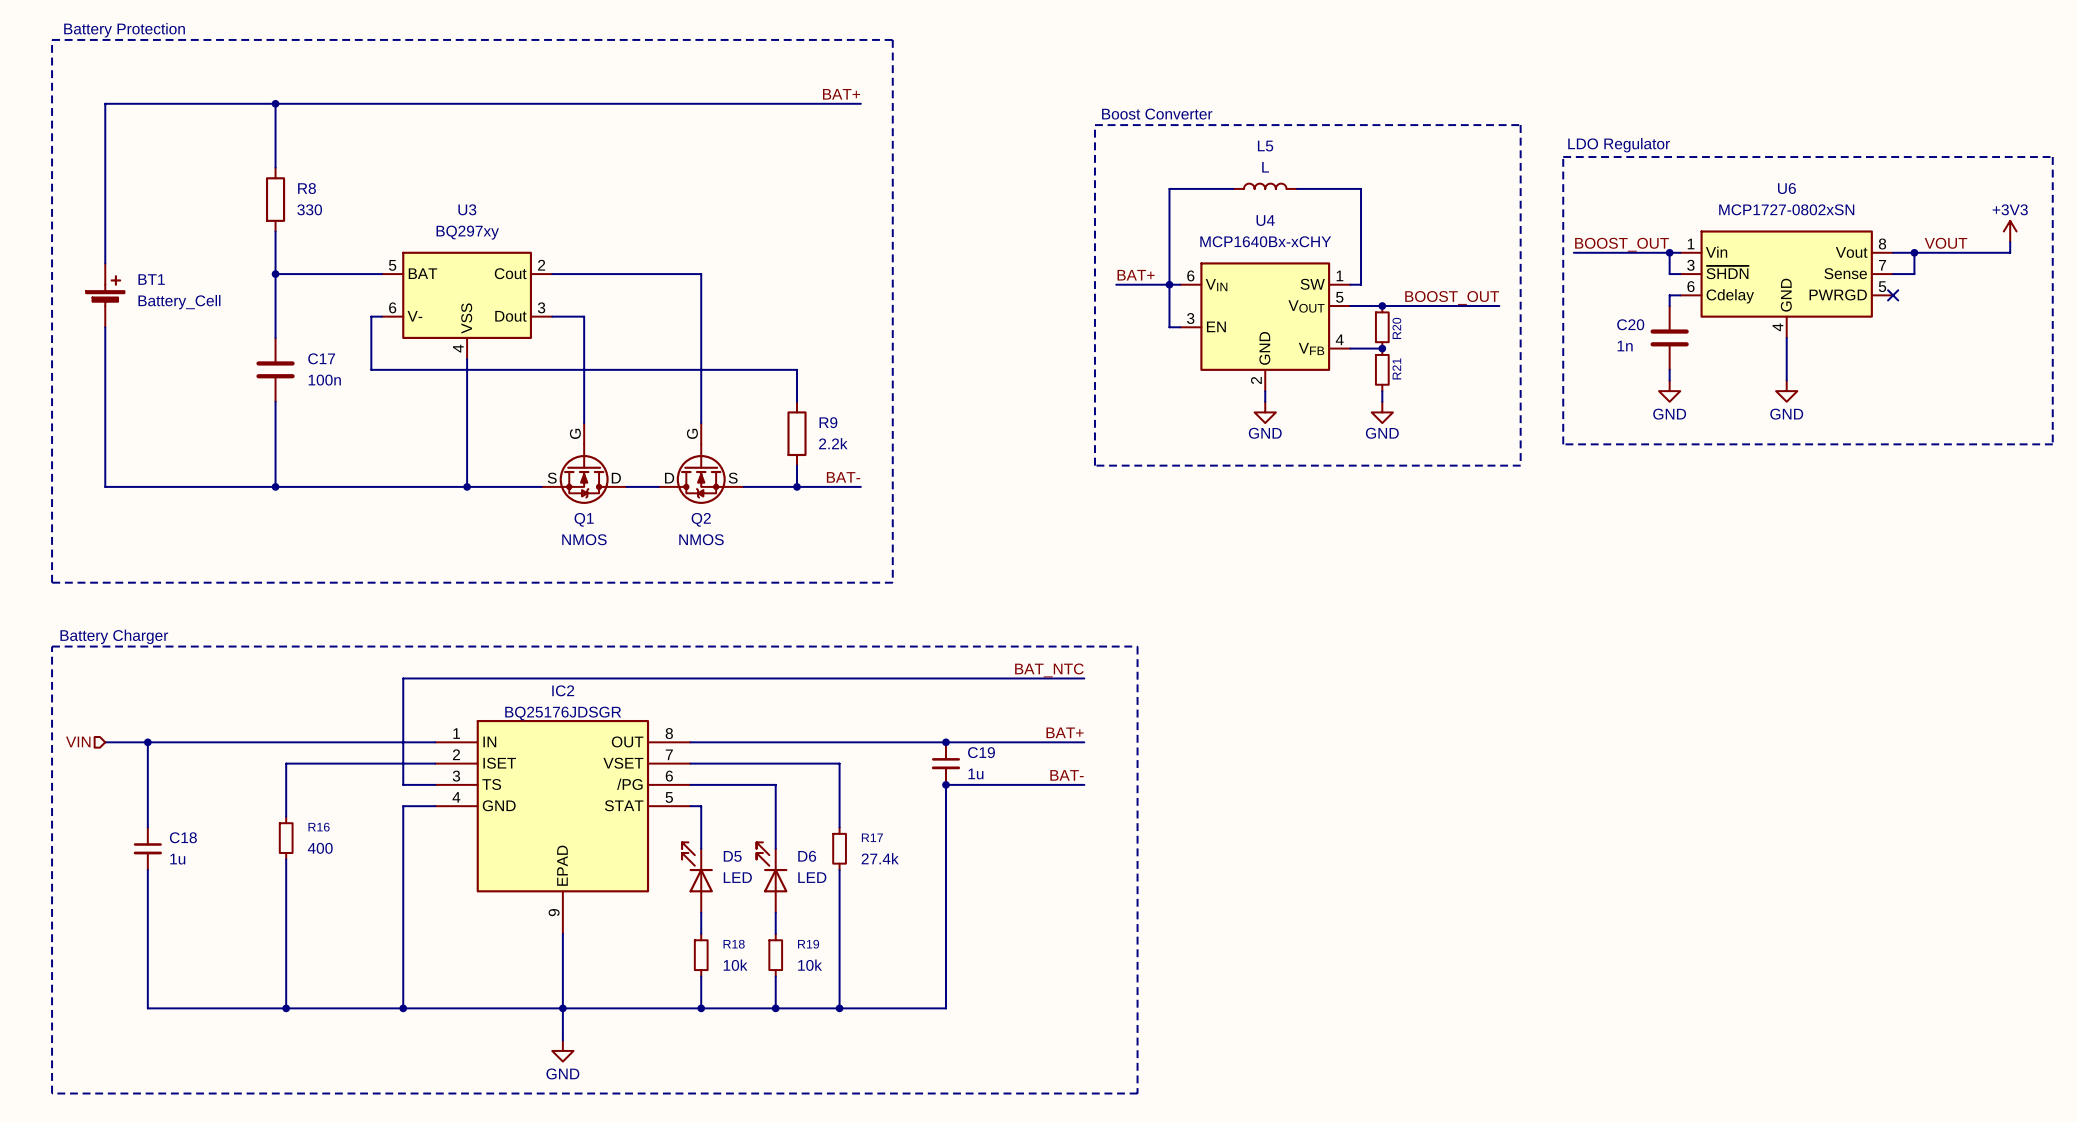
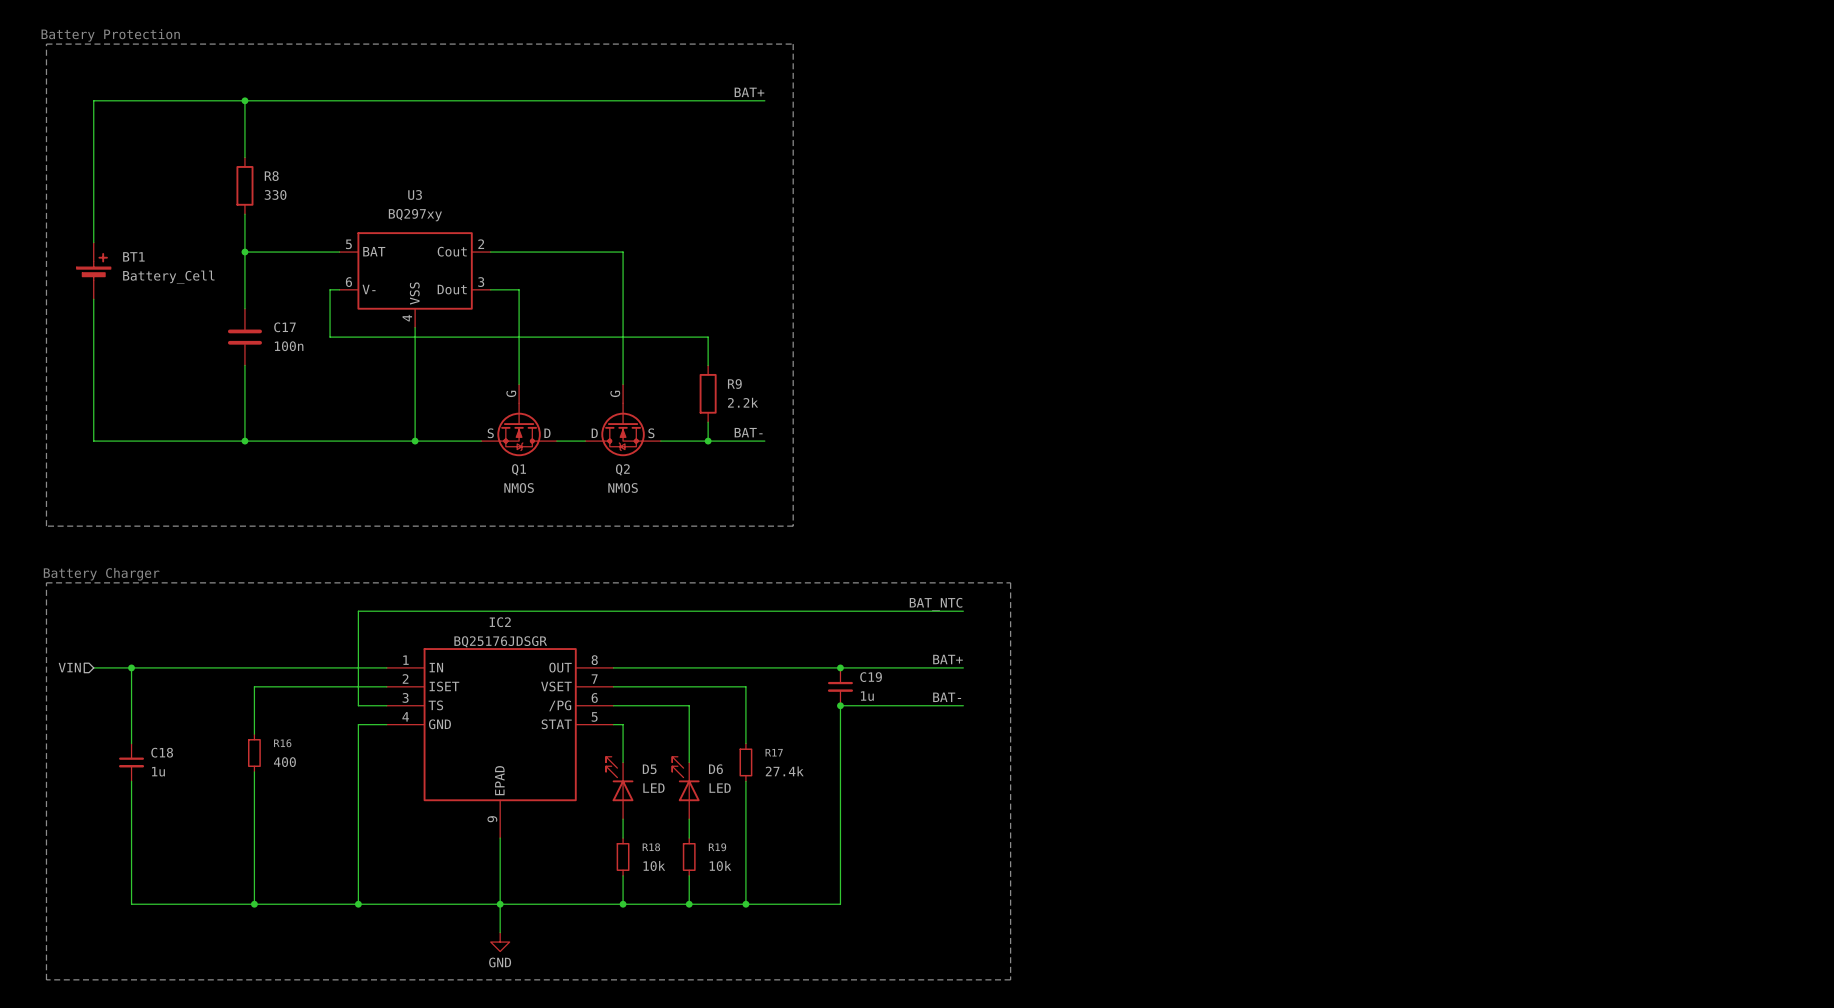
text: Boost Converter (1157, 114) -> none
line: (1094, 125) (1520, 125) (1520, 465) (1094, 465) (1094, 125) -> none
text: LDO Regulator (1619, 145) -> none
line: (1563, 157) (2052, 157) (2052, 444) (1563, 444) (1563, 157) -> none
L5: L (1265, 186) -> none
wire: (1233, 188) (1169, 188) (1169, 327) (1180, 327) -> none
wire: (1297, 188) (1361, 188) (1361, 284) (1350, 284) -> none
power symbol: +3V3 (2010, 231) -> none
wire: (2010, 242) (2010, 252) (1893, 252) -> none
label: VOUT (1946, 243) -> none
label: BOOST_OUT (1622, 244) -> none
wire: (1573, 252) (1680, 252) -> none
wire: (1669, 252) (1669, 274) (1680, 274) -> none
junction: (1669, 252) -> none
wire: (1914, 252) (1914, 274) (1893, 274) -> none
junction: (1914, 252) -> none
label: BAT+ (1136, 275) -> none
wire: (1116, 284) (1180, 284) -> none
junction: (1169, 284) -> none
U6: MCP1727-0802xSN (1786, 284) -> none
wire: (1680, 295) (1669, 295) (1669, 306) -> none
no-connect mark: (1893, 295) -> none
label: BOOST_OUT (1452, 297) -> none
wire: (1350, 306) (1499, 306) -> none
junction: (1382, 306) -> none
U4: MCP1640Bx-xCHY (1265, 326) -> none
R20: (1382, 327) -> none
C20: 1n (1669, 337) -> none
wire: (1786, 337) (1786, 380) -> none
wire: (1350, 348) (1382, 348) -> none
junction: (1382, 348) -> none
R21: (1382, 369) -> none
wire: (1669, 369) (1669, 380) -> none
wire: (1265, 391) (1265, 401) -> none
wire: (1382, 391) (1382, 401) -> none
power symbol: GND (1669, 391) -> none
power symbol: GND (1786, 391) -> none
power symbol: GND (1265, 412) -> none
power symbol: GND (1382, 412) -> none

